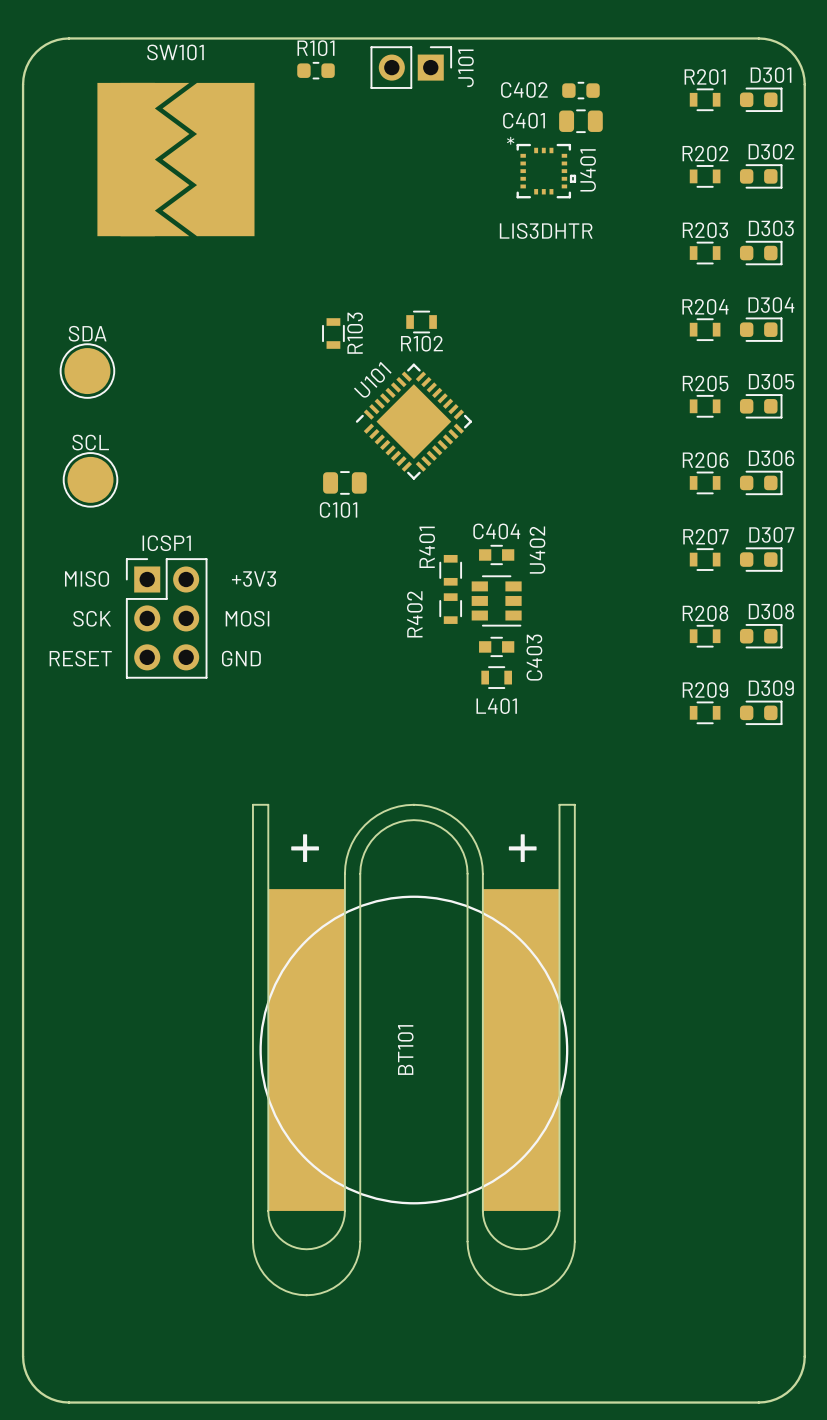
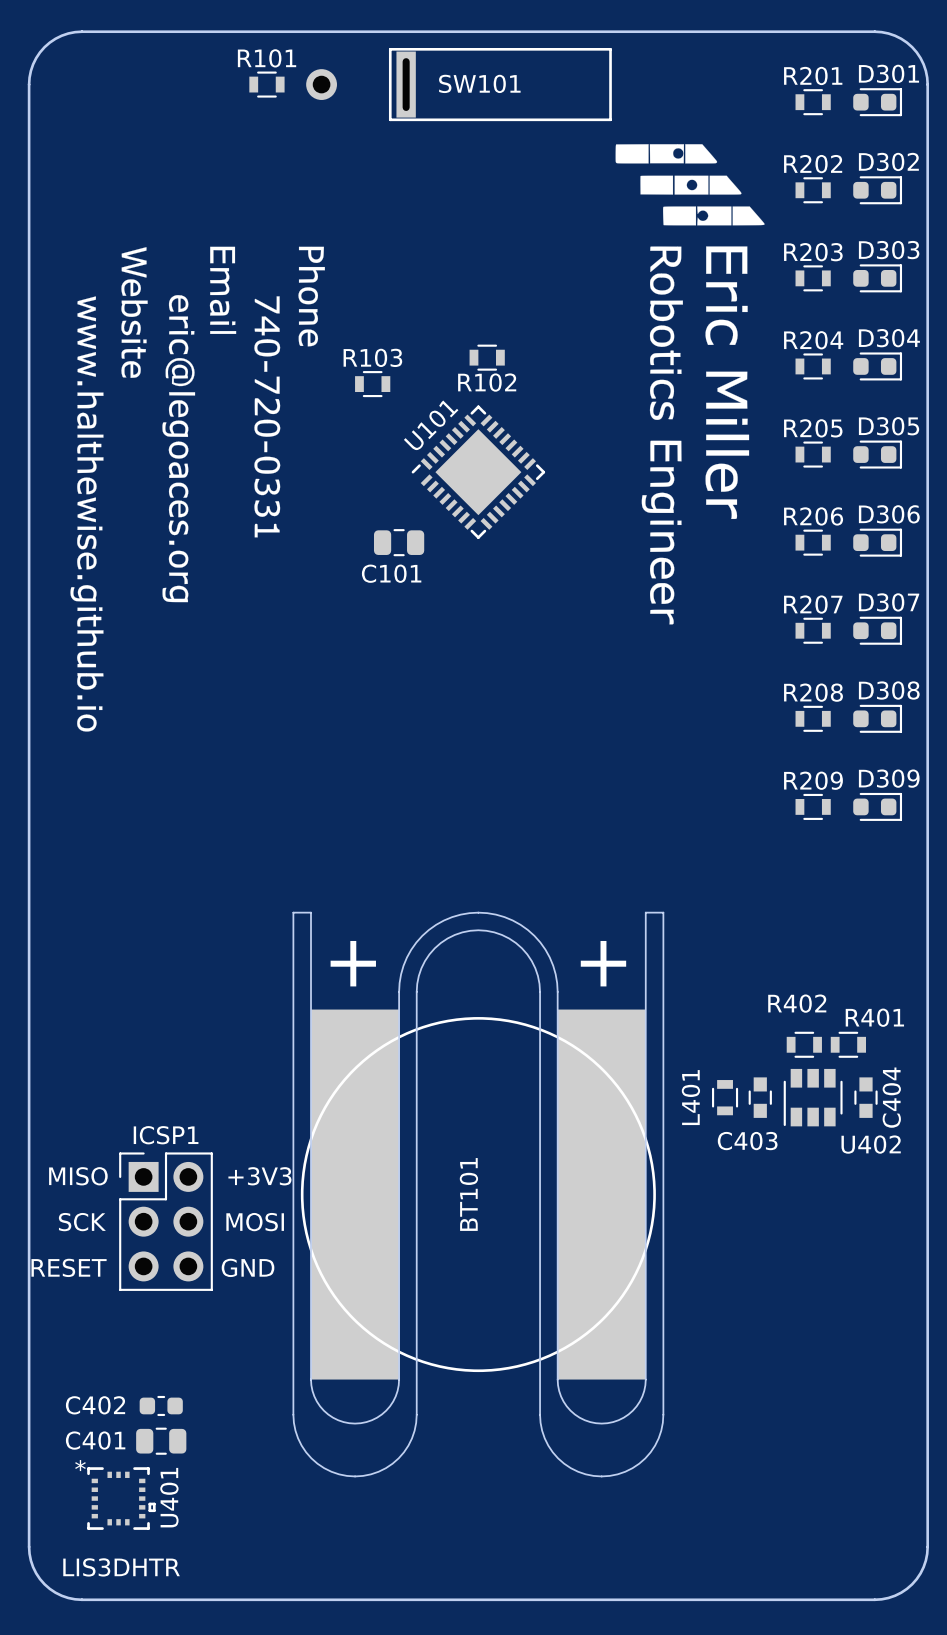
SW101 name position: SW101 (175, 52) -> SW101 (479, 83)
R101 footprint: [297, 61, 335, 80] -> [249, 71, 285, 98]
J101: (411, 67) -> none
SW101 footprint: [97, 82, 255, 237] -> [306, 48, 612, 122]
C402 position: (580, 90) -> (161, 1405)
C401 position: (580, 121) -> (161, 1441)
drawing: none -> [70, 144, 765, 732]
U401 position: (546, 171) -> (121, 1498)
R103 rotation: 0° (333, 333) -> 90° clockwise (372, 384)
R103 name position: R103 (355, 333) -> R103 (372, 357)
SDA: (87, 371) -> none
SCL: (90, 479) -> none
C404 rotation: 0° (496, 554) -> 90° clockwise (866, 1097)
C404 position: (496, 554) -> (866, 1097)
R401 rotation: 0° (450, 570) -> 90° clockwise (848, 1044)
R401 position: (450, 570) -> (848, 1044)
text: MISO (87, 578) -> none
text: +3V3 (254, 579) -> none
U402 rotation: 0° (496, 600) -> 90° clockwise (813, 1097)
U402 position: (496, 600) -> (813, 1097)
R402 rotation: 0° (450, 608) -> 90° clockwise (804, 1044)
R402 position: (450, 608) -> (804, 1044)
text: SCK (92, 618) -> none
ICSP1 position: (166, 618) -> (166, 1221)
text: MOSI (247, 618) -> none
C403 rotation: 0° (496, 646) -> 90° clockwise (760, 1097)
C403 position: (496, 646) -> (760, 1097)
text: RESET (80, 658) -> none
text: GND (241, 658) -> none
L401 rotation: 0° (496, 677) -> 90° clockwise (725, 1097)
L401 position: (496, 677) -> (725, 1097)
text: none -> MISO (78, 1176)
text: none -> +3V3 (259, 1176)
text: none -> SCK (82, 1222)
text: none -> MOSI (255, 1222)
text: none -> RESET (69, 1267)
text: none -> GND (248, 1267)

